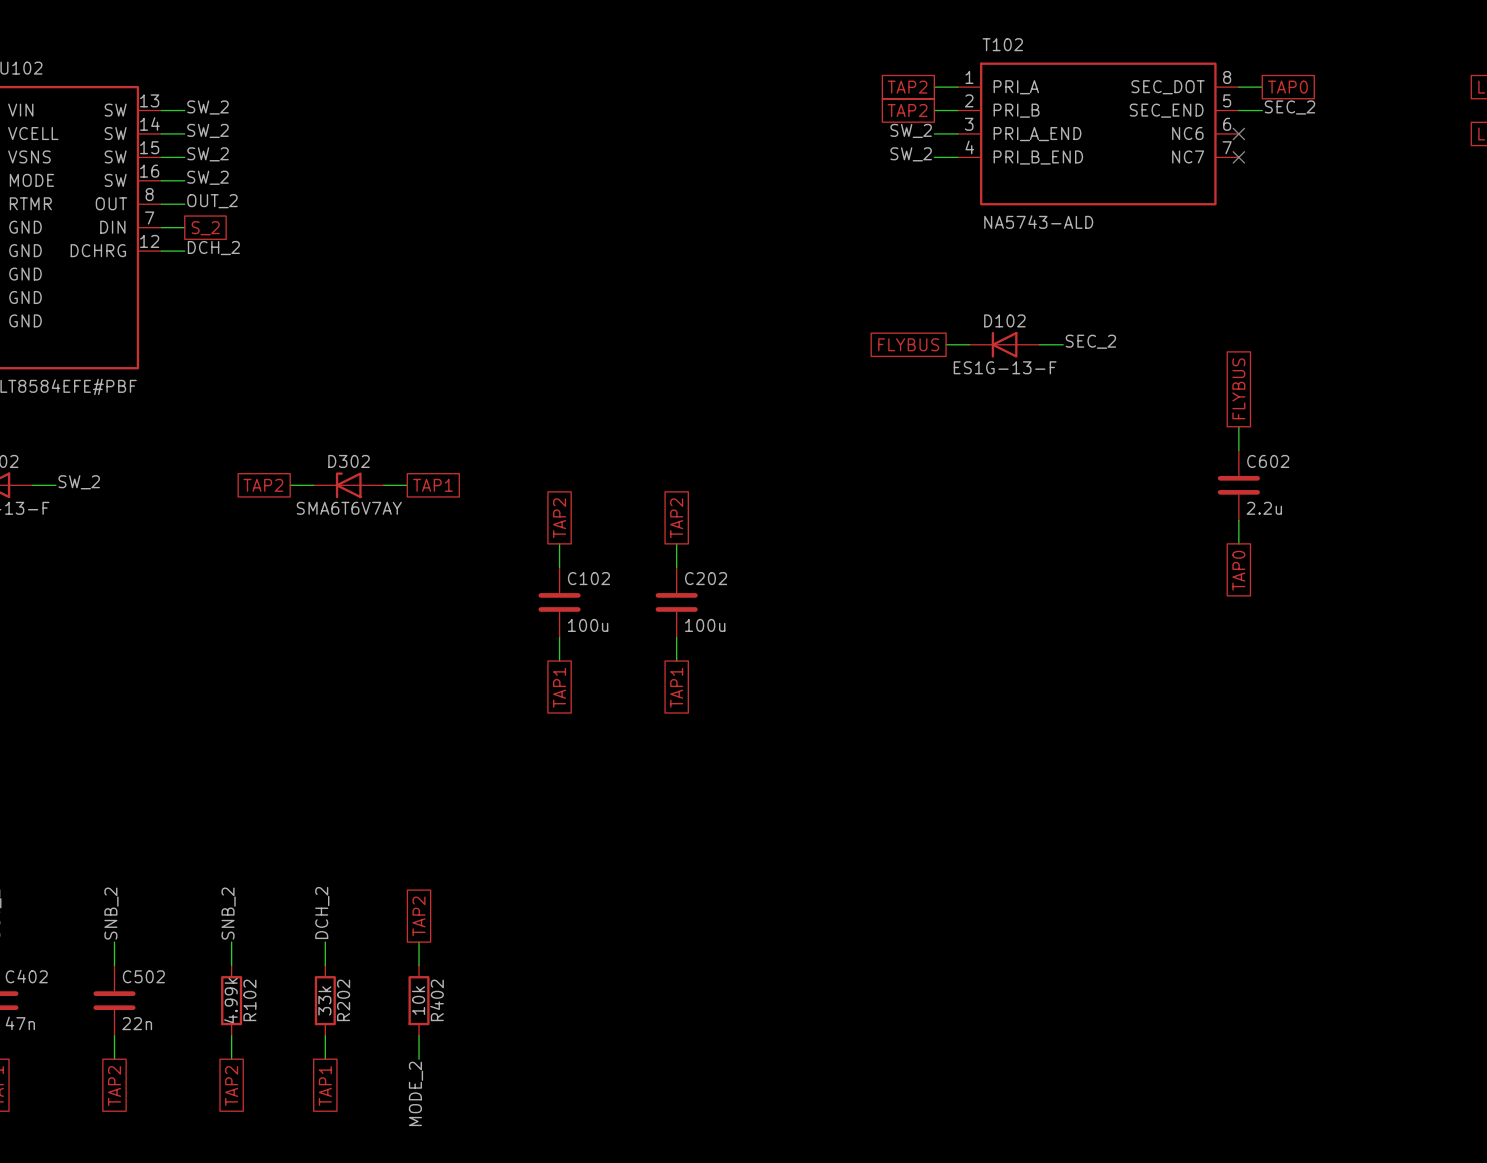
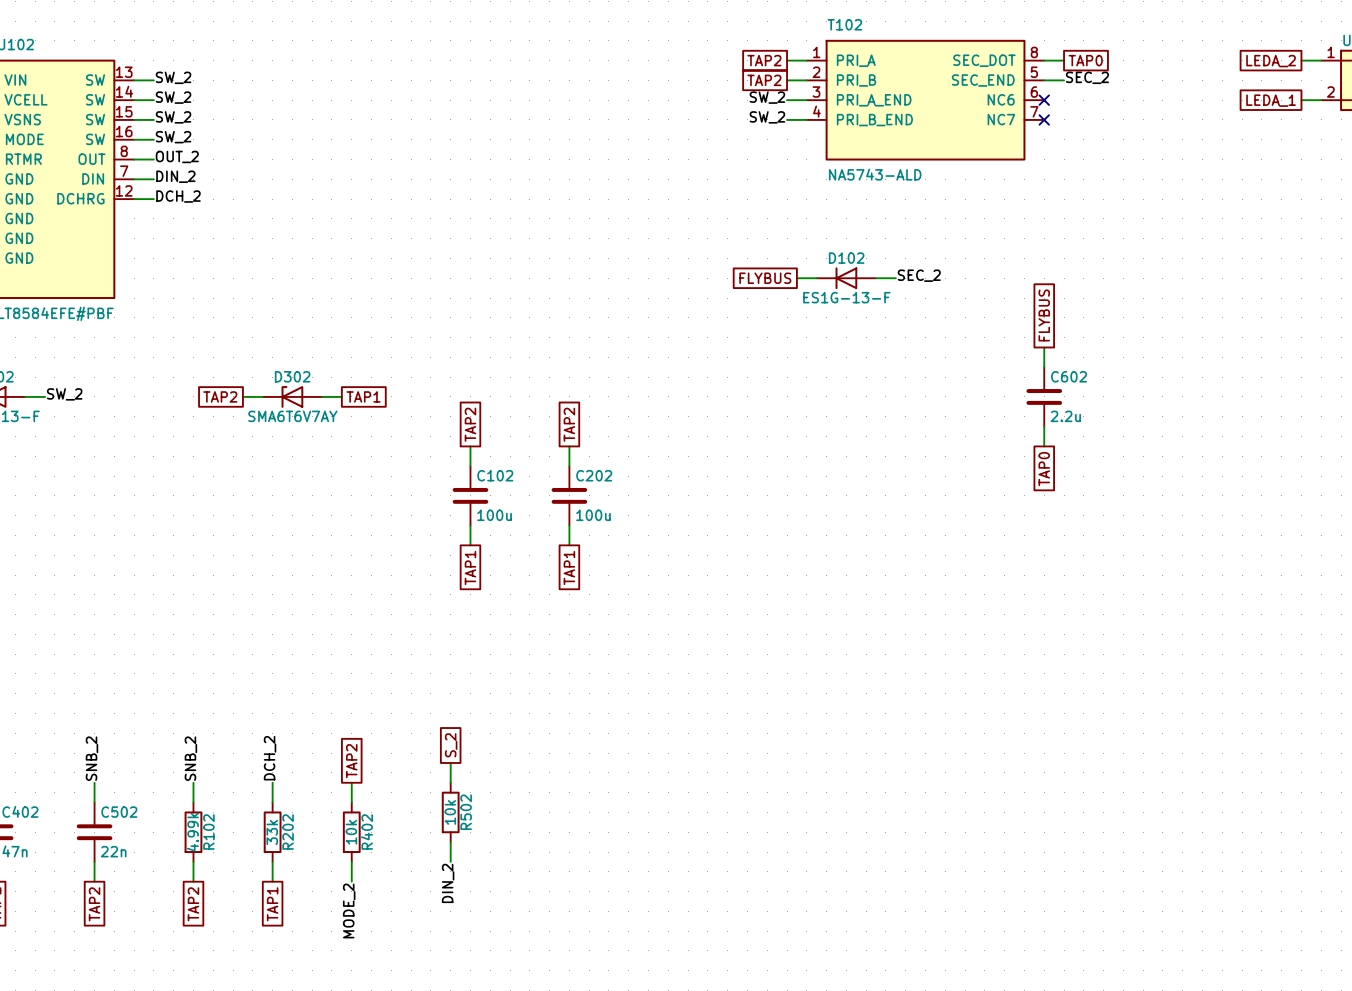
label: none -> DIN_2 (175, 176)
global label: S_2 (205, 228) -> none
global label: none -> S_2 (451, 745)
wire: none -> (450, 762) (450, 782)
R502: none -> 10k (450, 812)
wire: none -> (450, 842) (450, 861)
label: none -> DIN_2 (448, 883)

